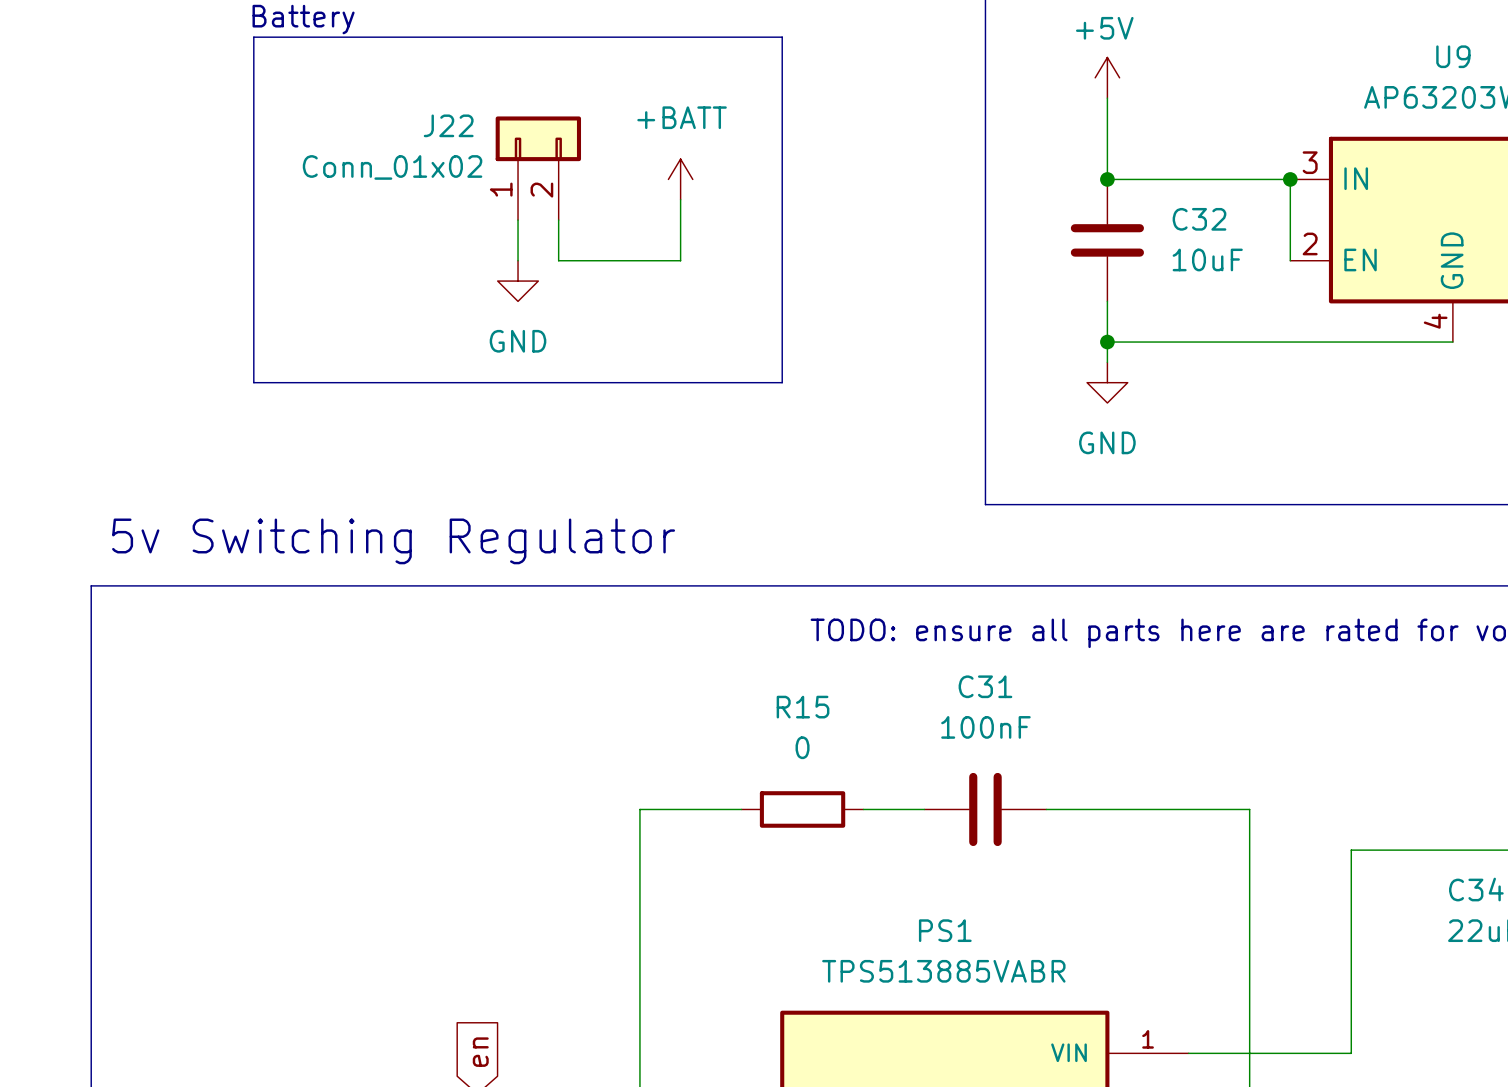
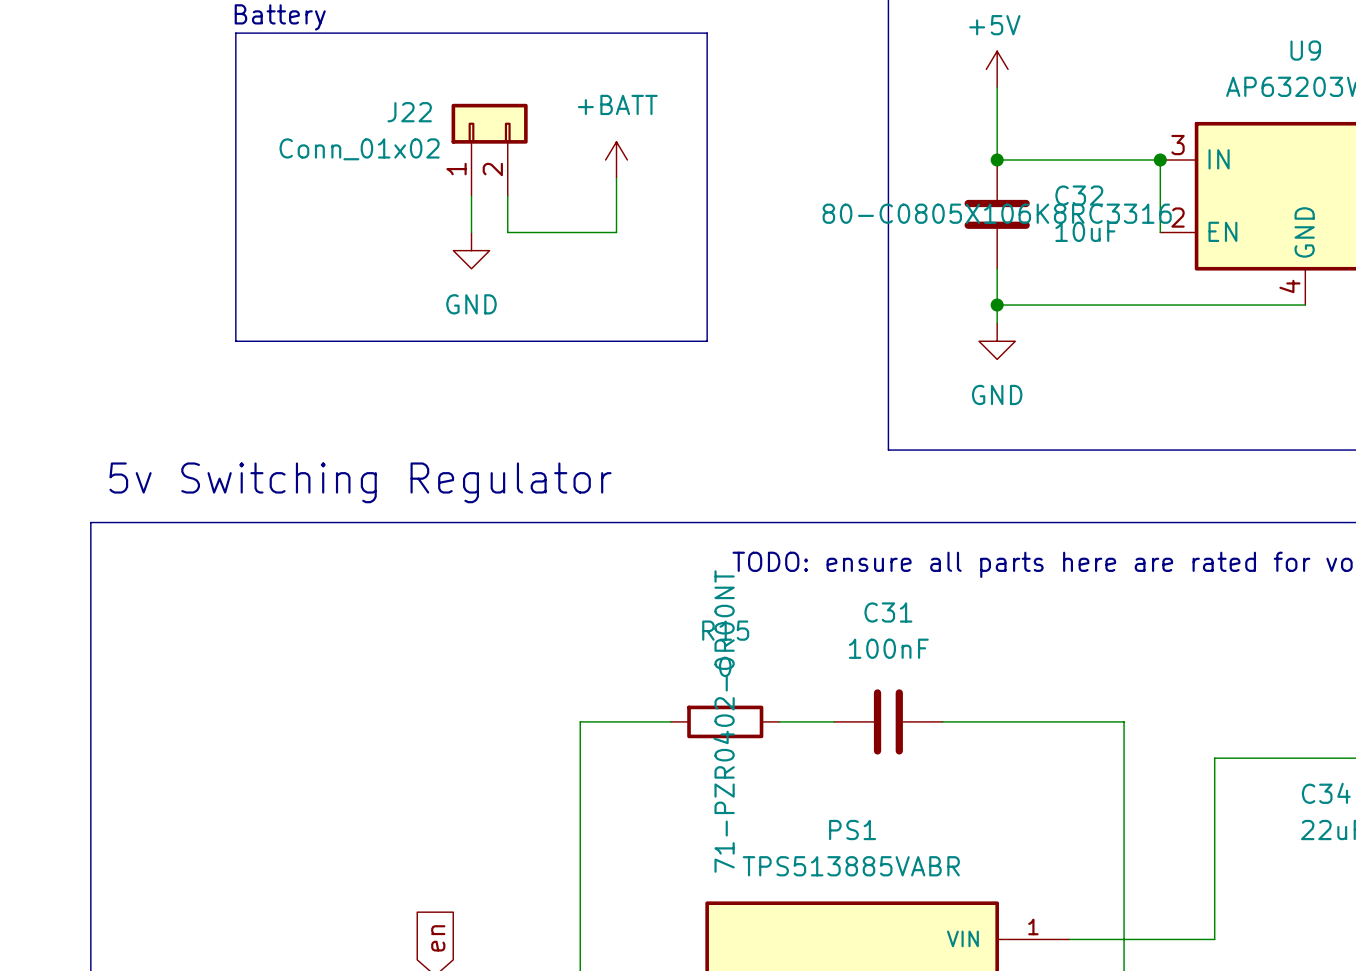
C32 text: none -> 80-C0805X106K8RC3316 (997, 213)
R15 text: none -> 71-PZR0402-0R00NT (724, 721)

